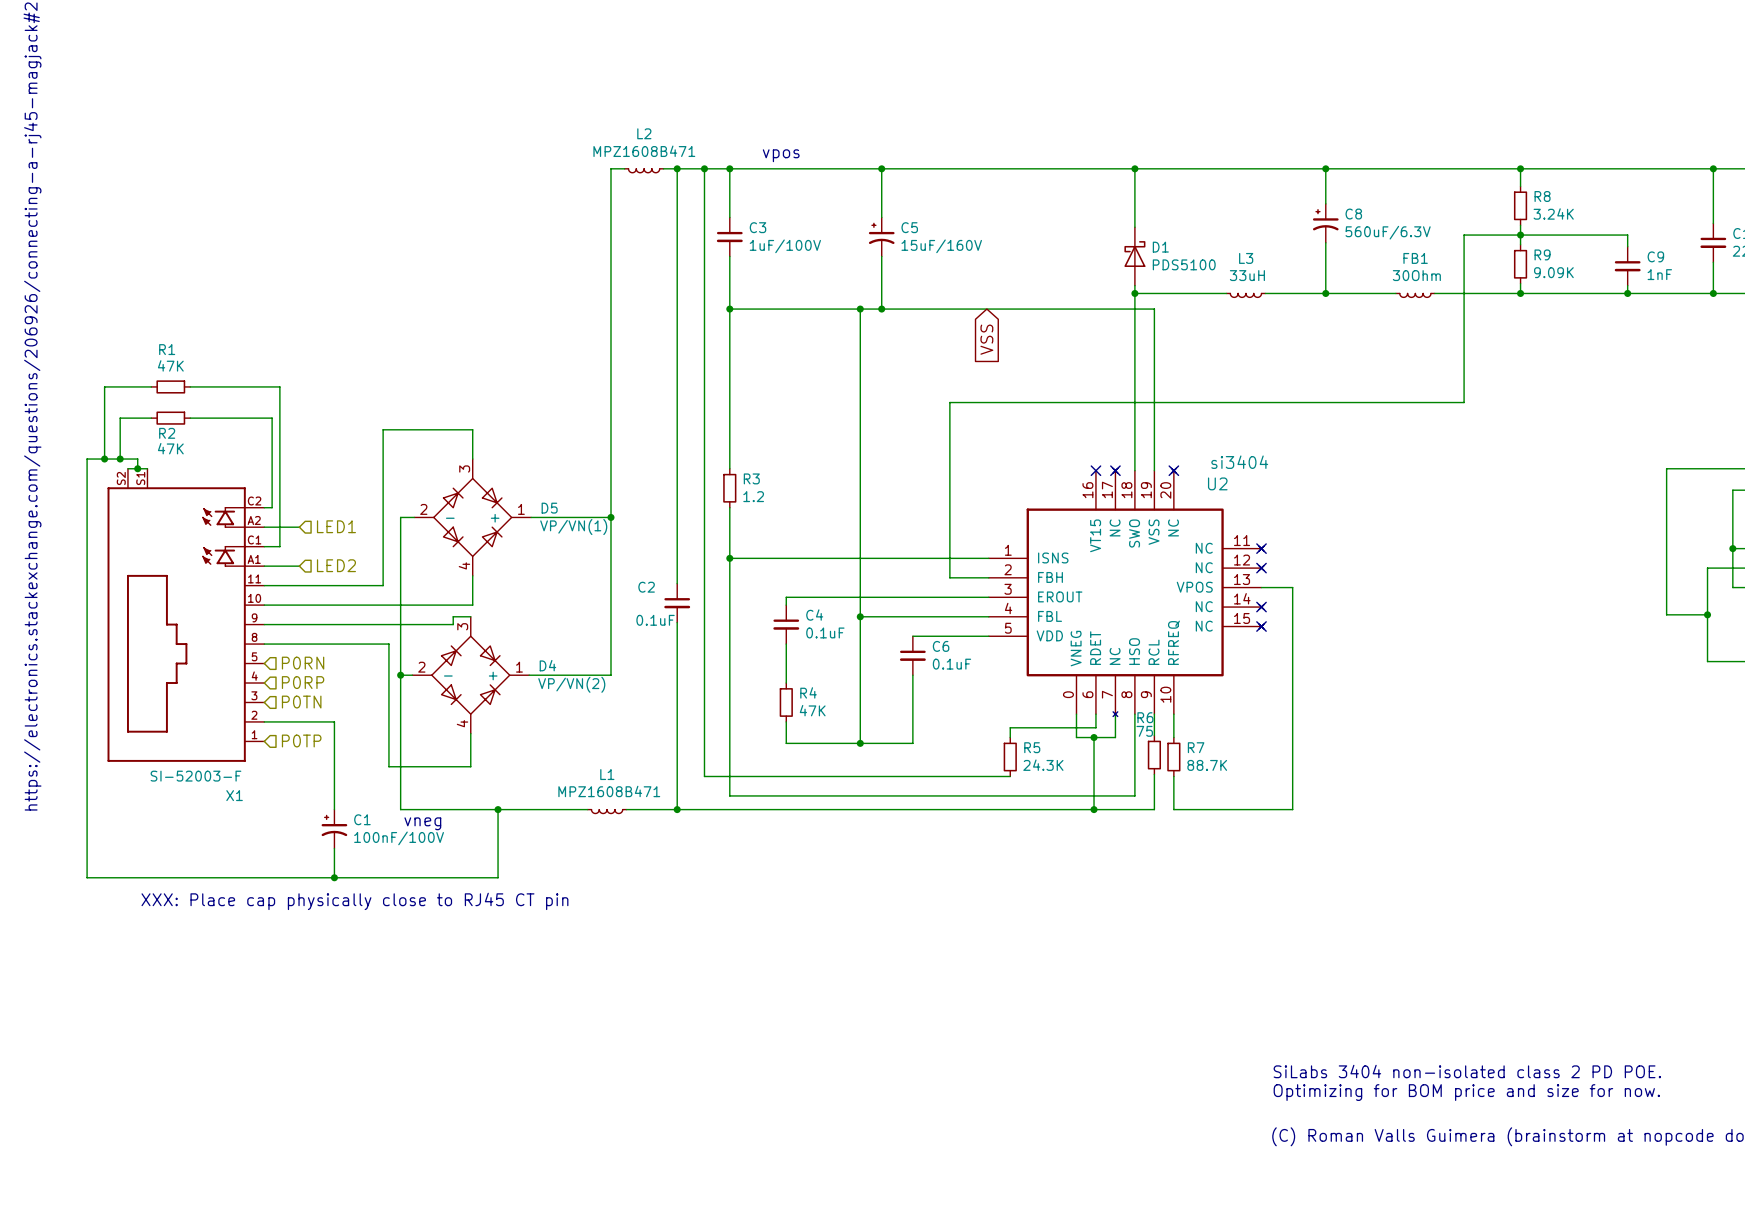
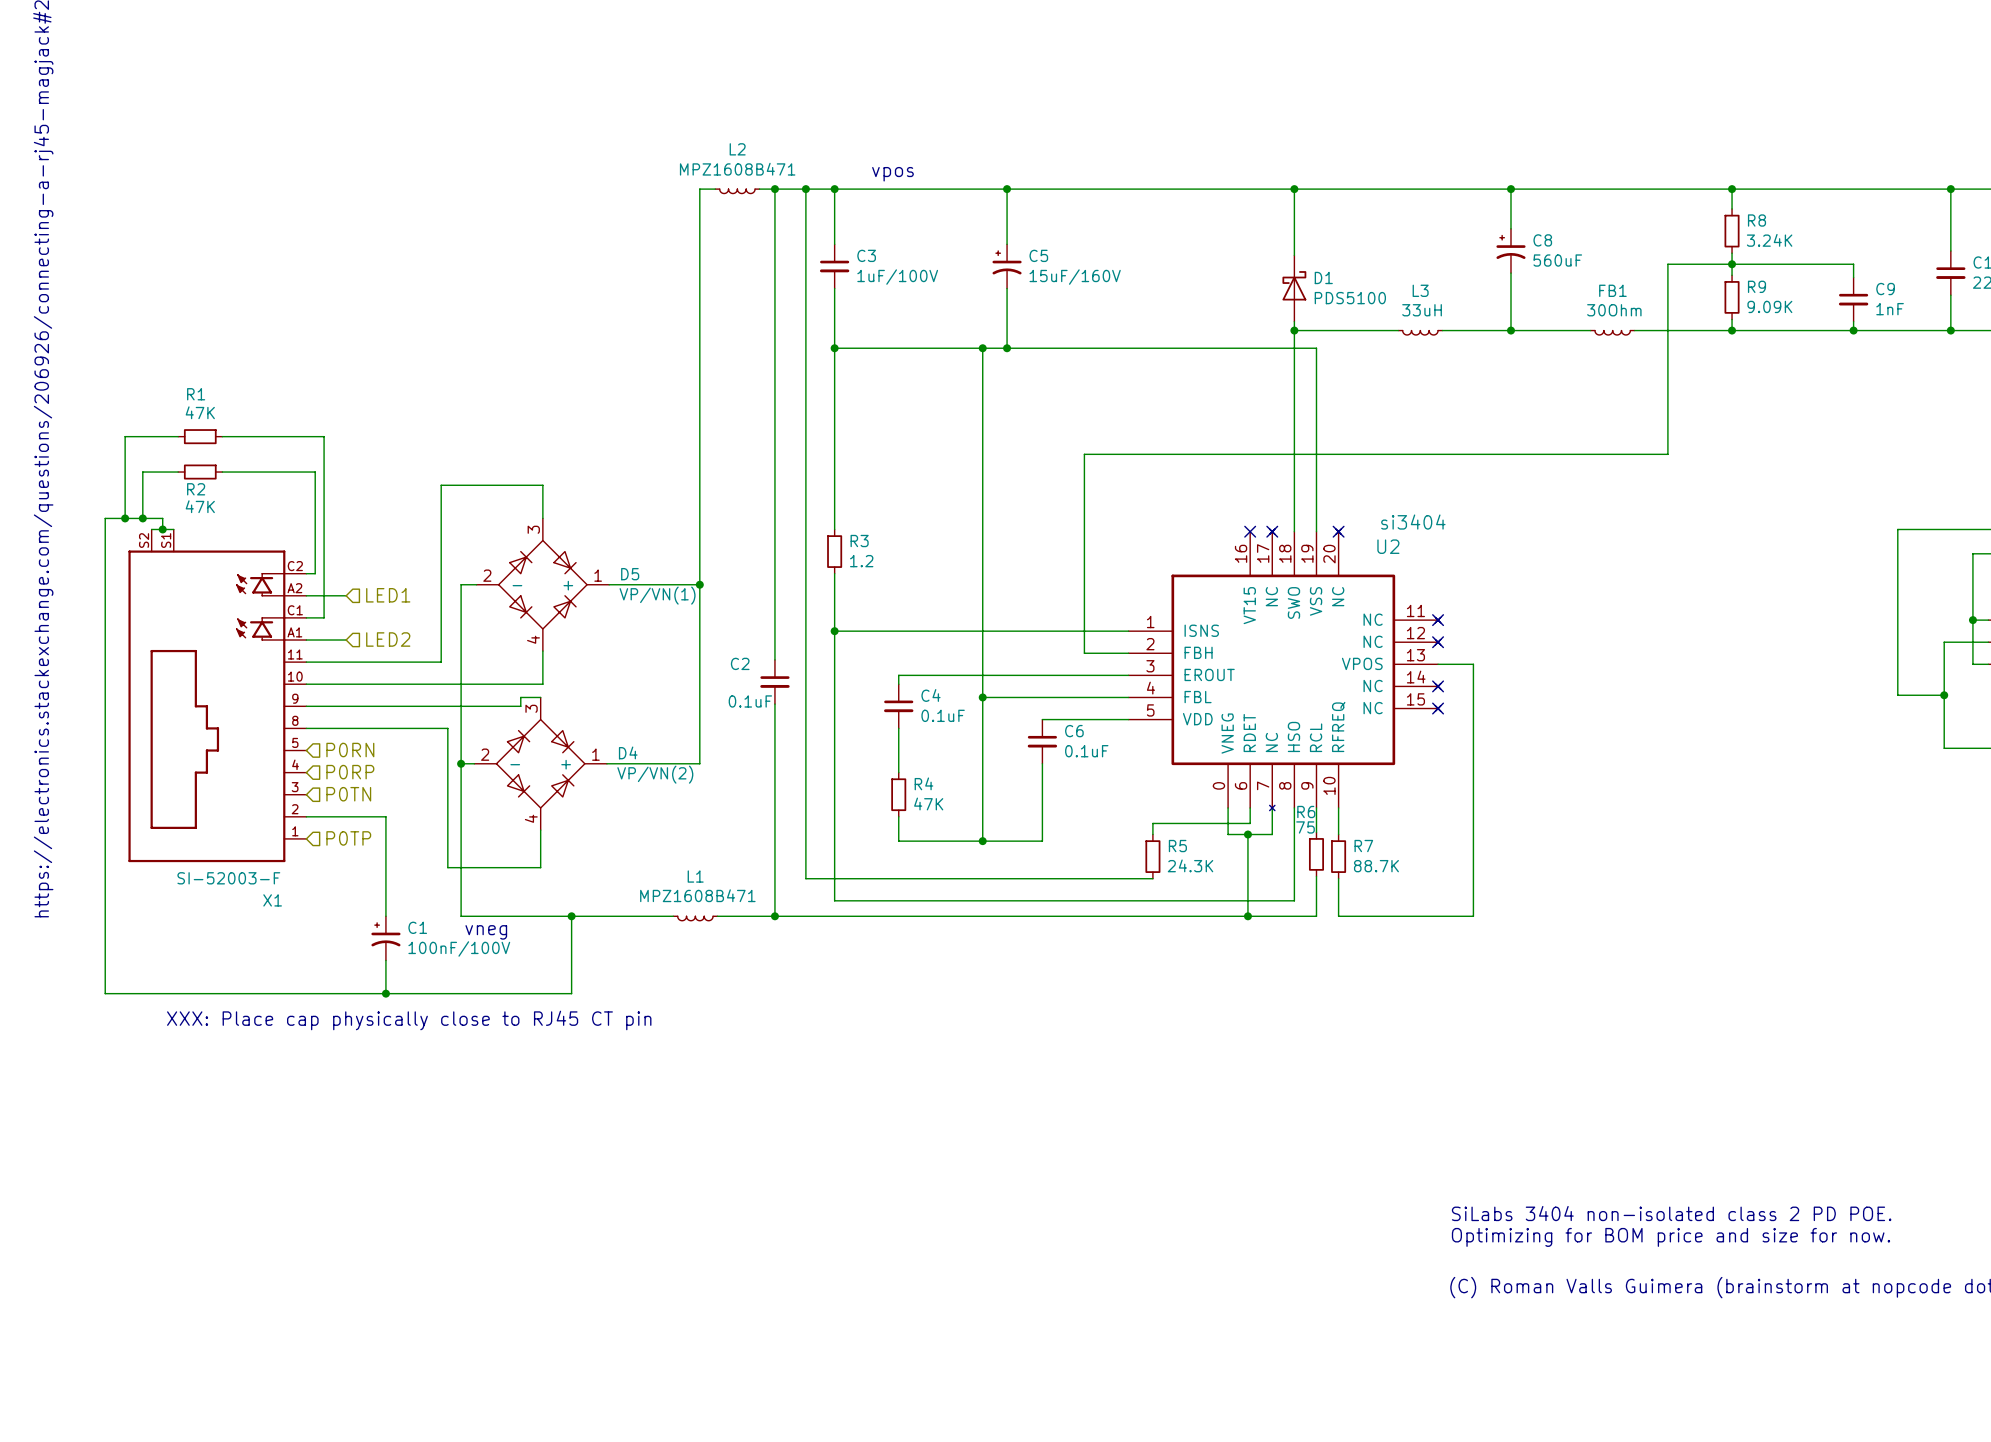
C8 value: 560uF/6.3V (1388, 232) -> 560uF (1557, 260)
global label: VSS (986, 339) -> none

